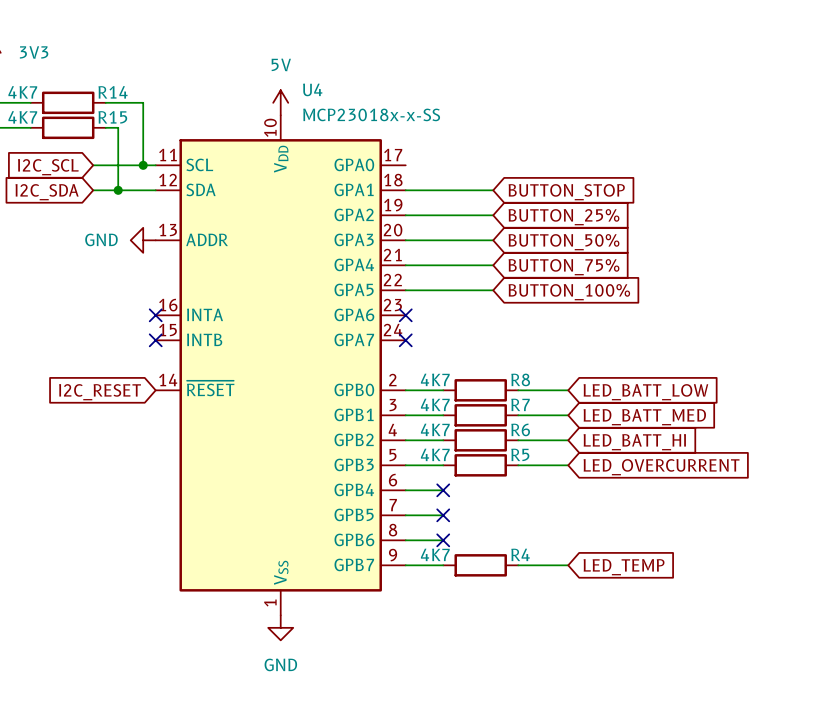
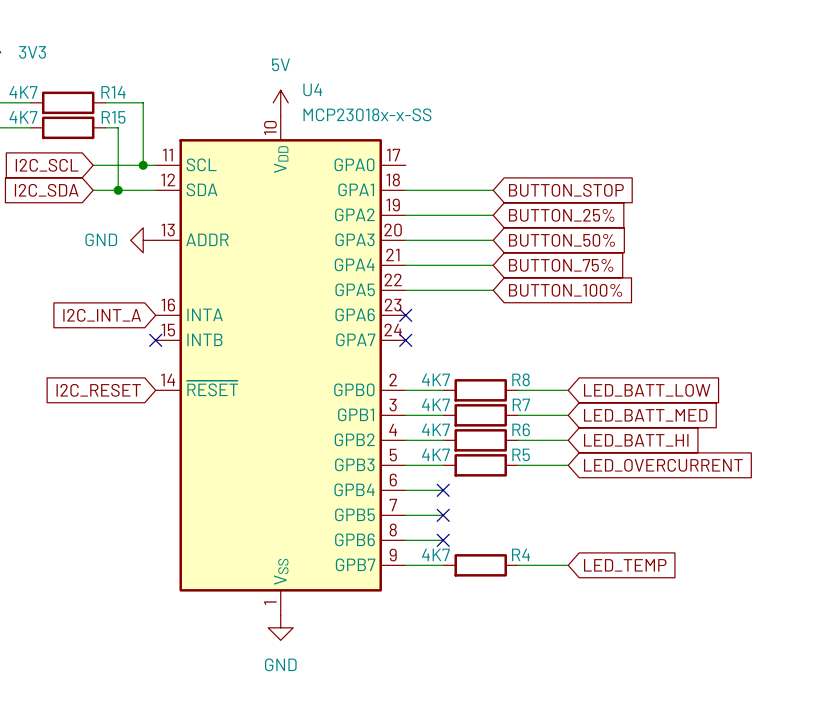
no-connect mark: (155, 315) -> none
global label: none -> I2C_INT_A (102, 315)

